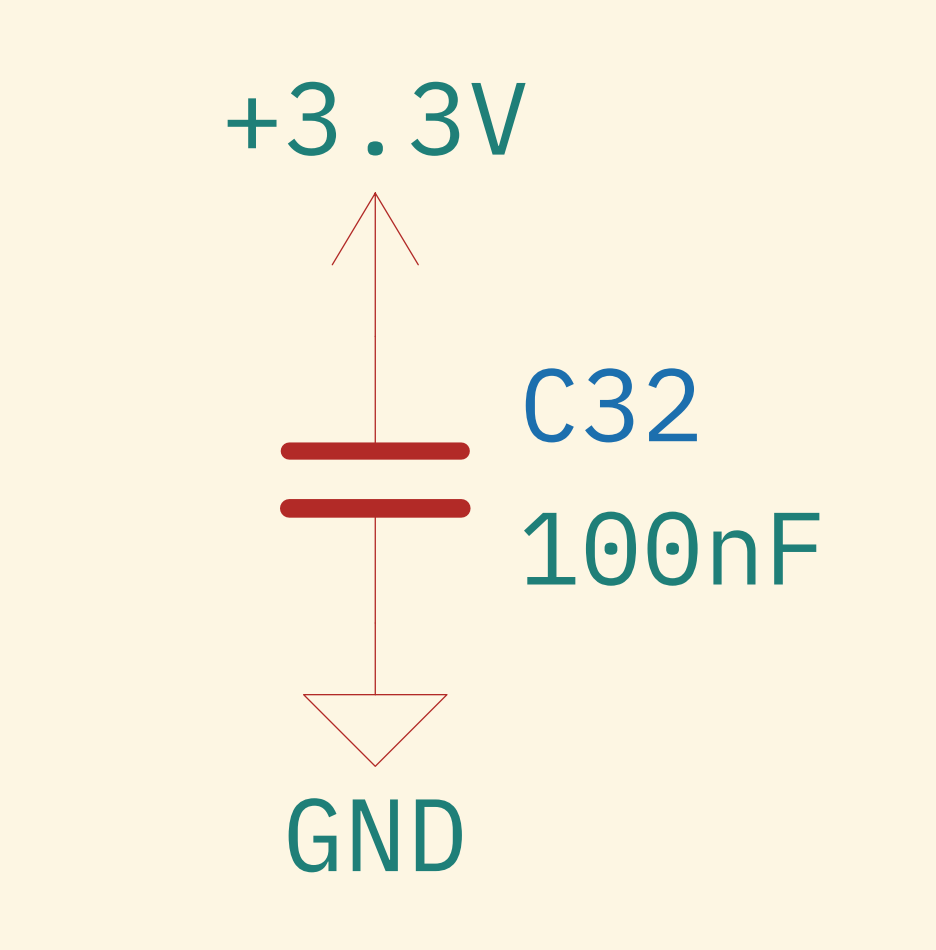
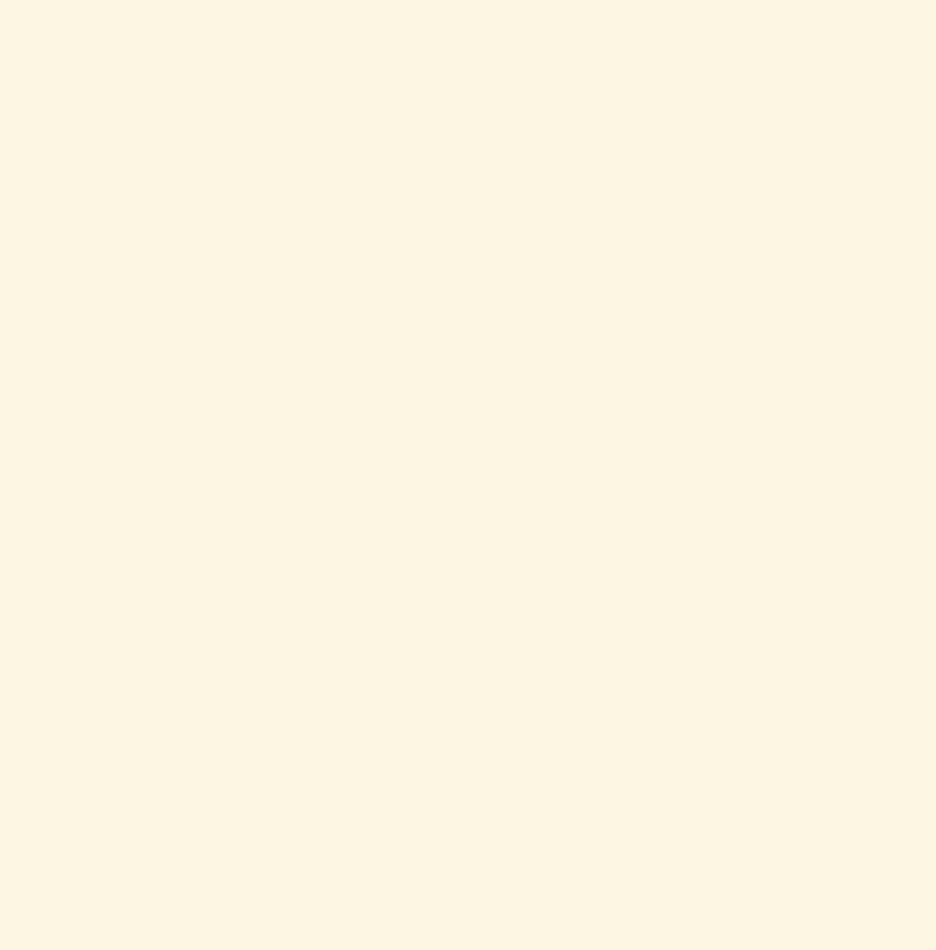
power symbol: +3.3V (375, 264) -> none
C32: 100nF (375, 479) -> none
power symbol: GND (375, 694) -> none

